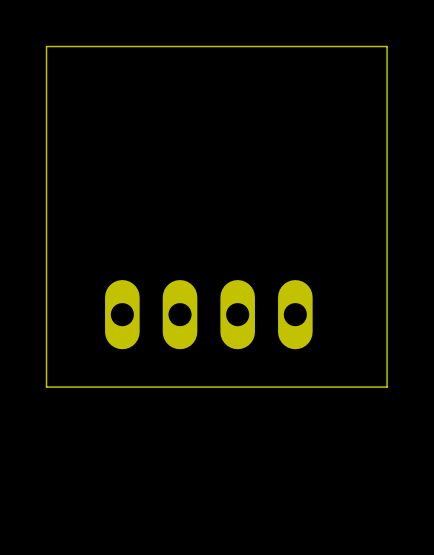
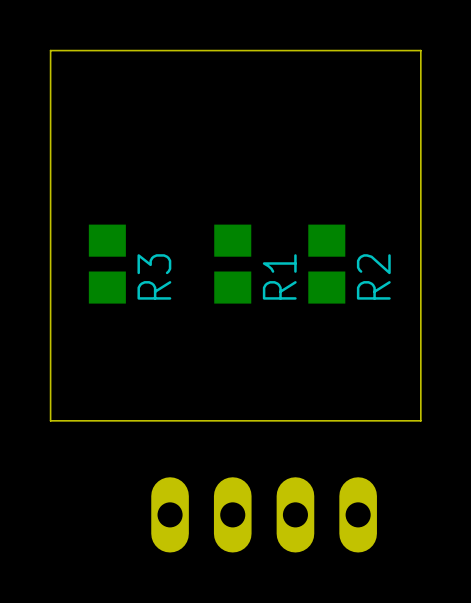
R3: none -> (107, 264)
R1: none -> (232, 264)
R2: none -> (326, 264)
part position: (208, 314) -> (264, 514)

